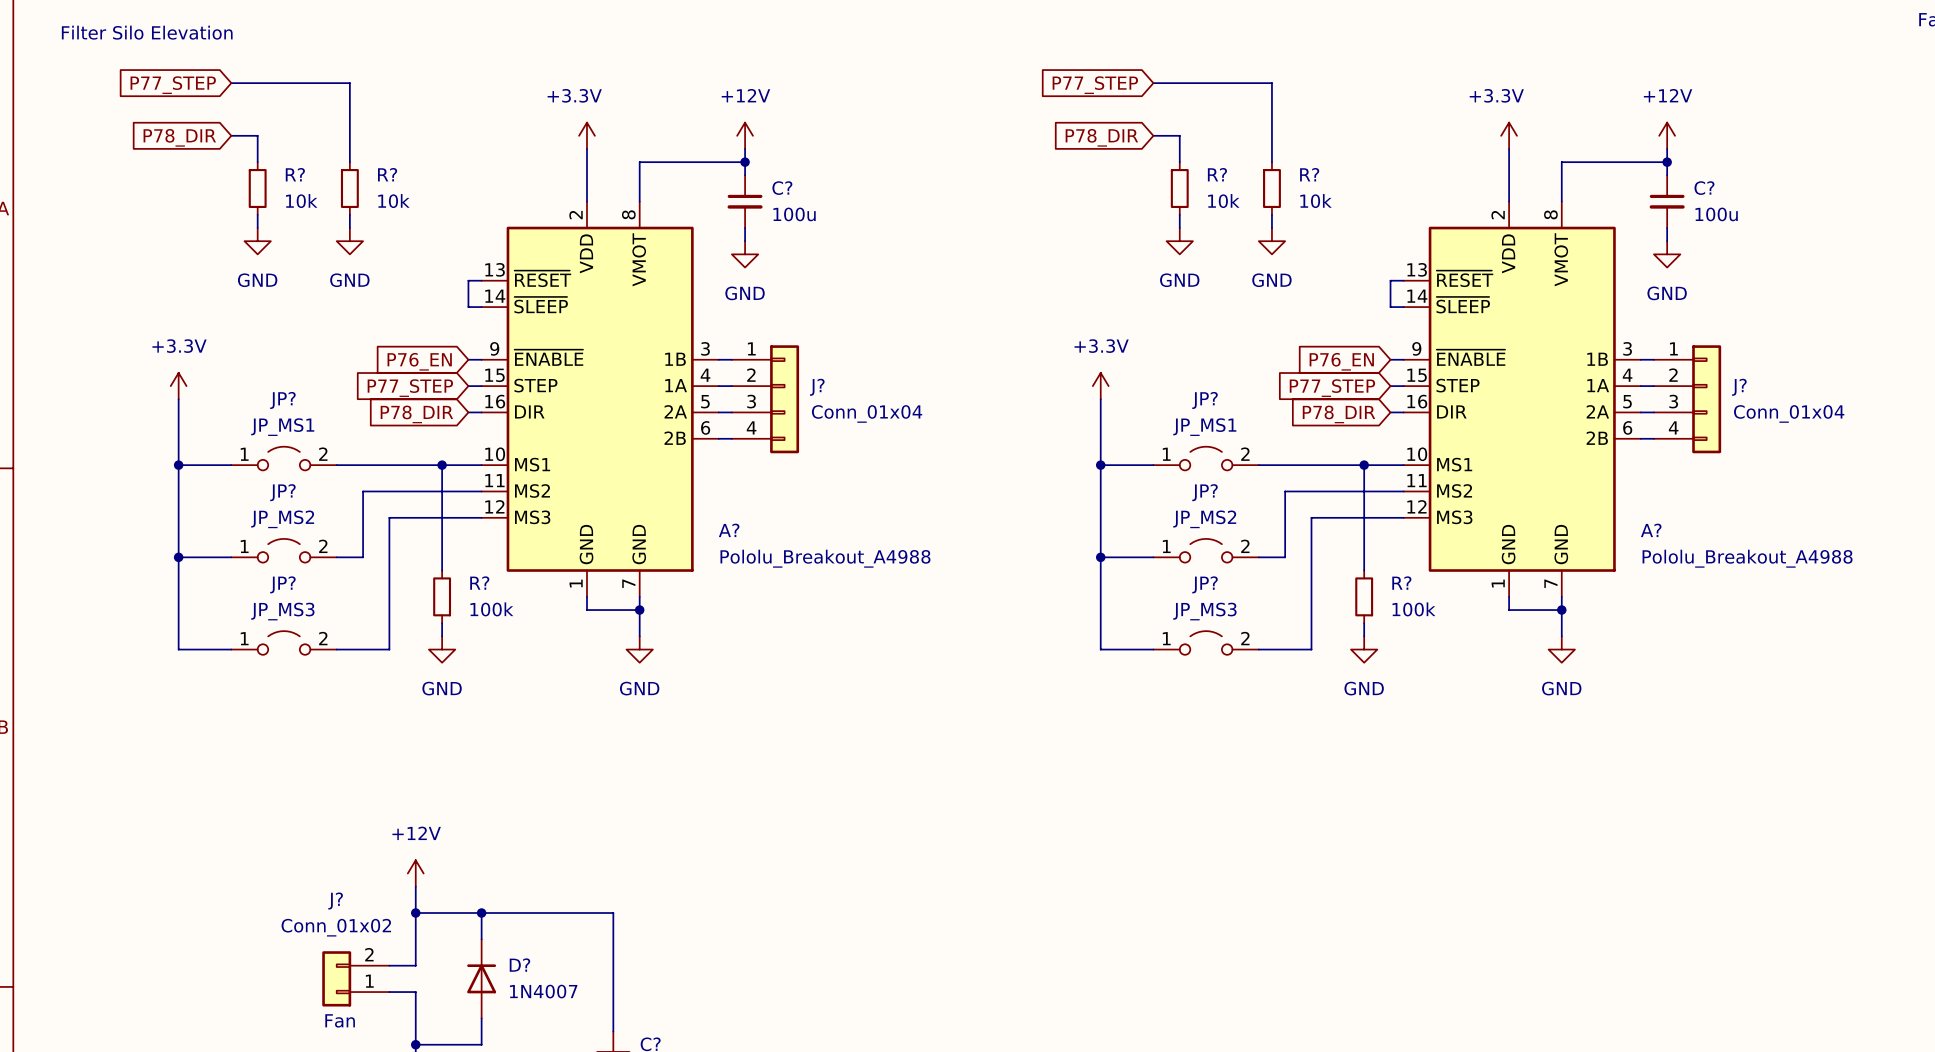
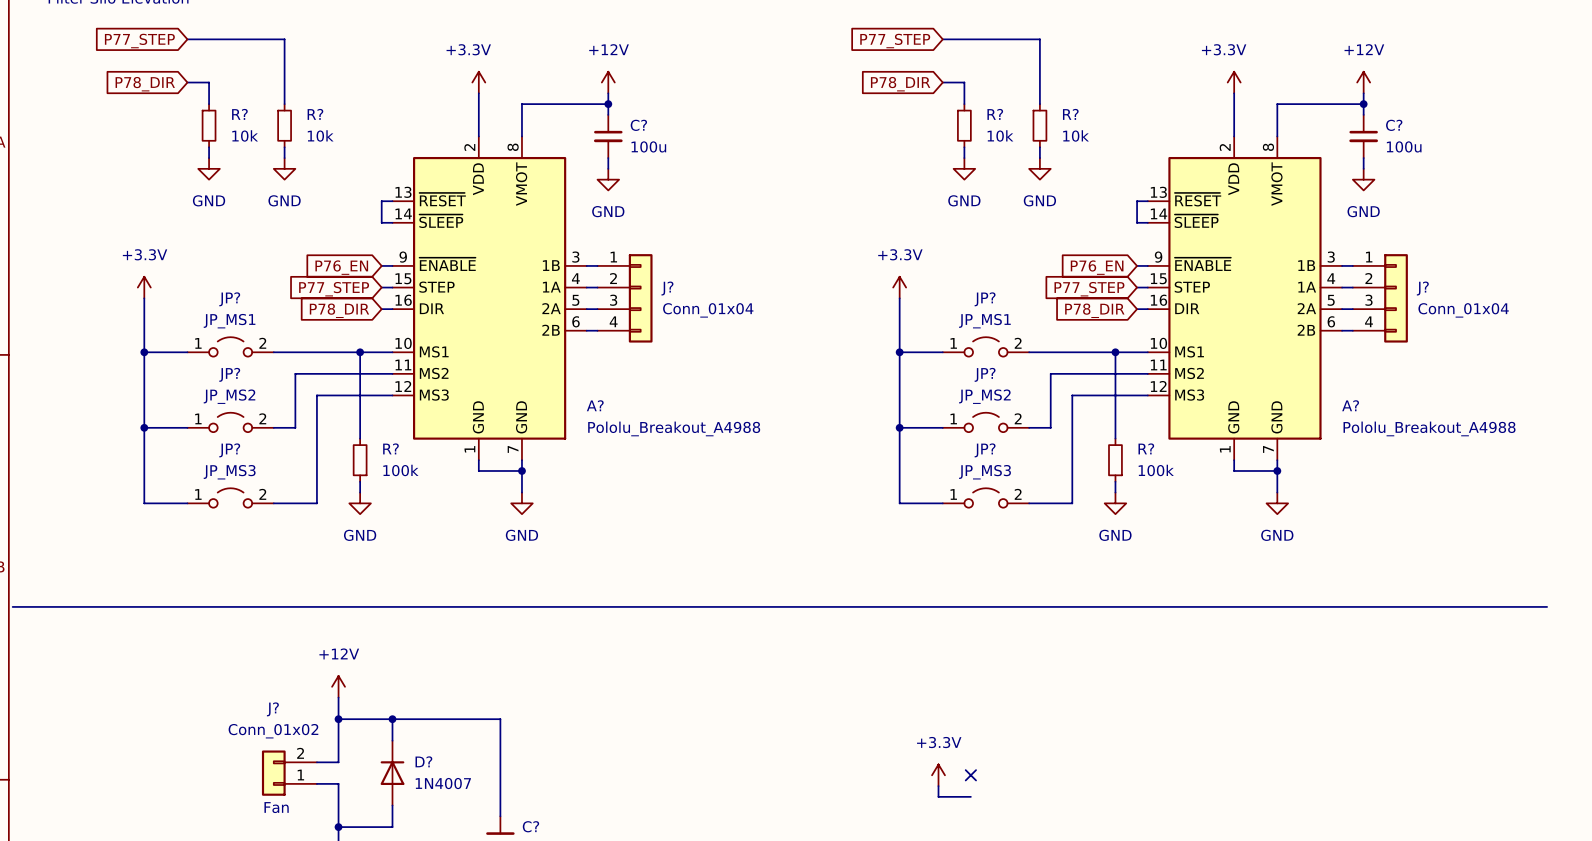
line: none -> (12, 606) (1547, 606)
power symbol: none -> +3.3V (938, 775)
no-connect mark: none -> (970, 775)
wire: none -> (938, 786) (938, 796) (970, 796)

